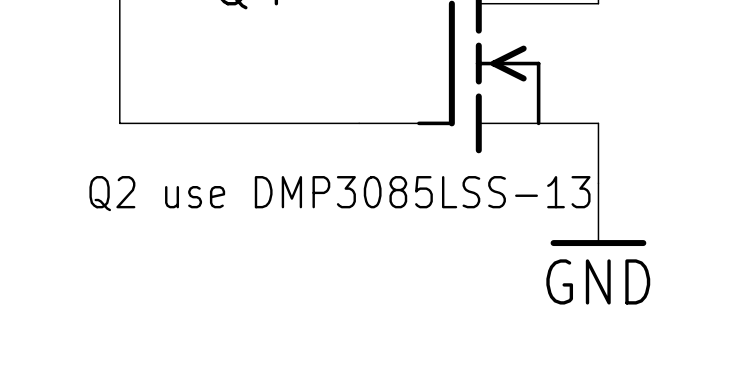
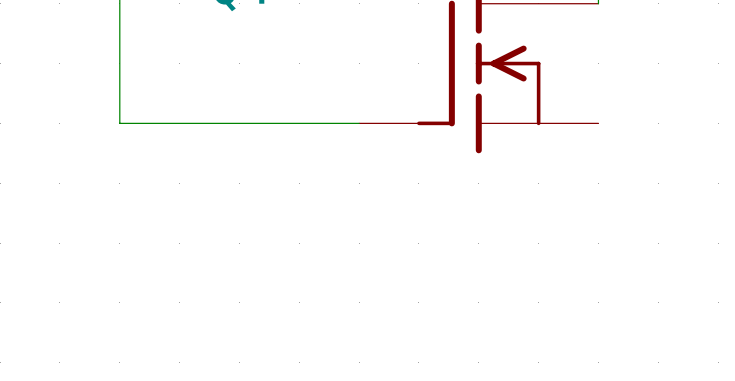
wire: (598, 123) (598, 183) -> none
text: Q2 use DMP3085LSS-13 (339, 193) -> none
power symbol: GND (598, 214) -> none

